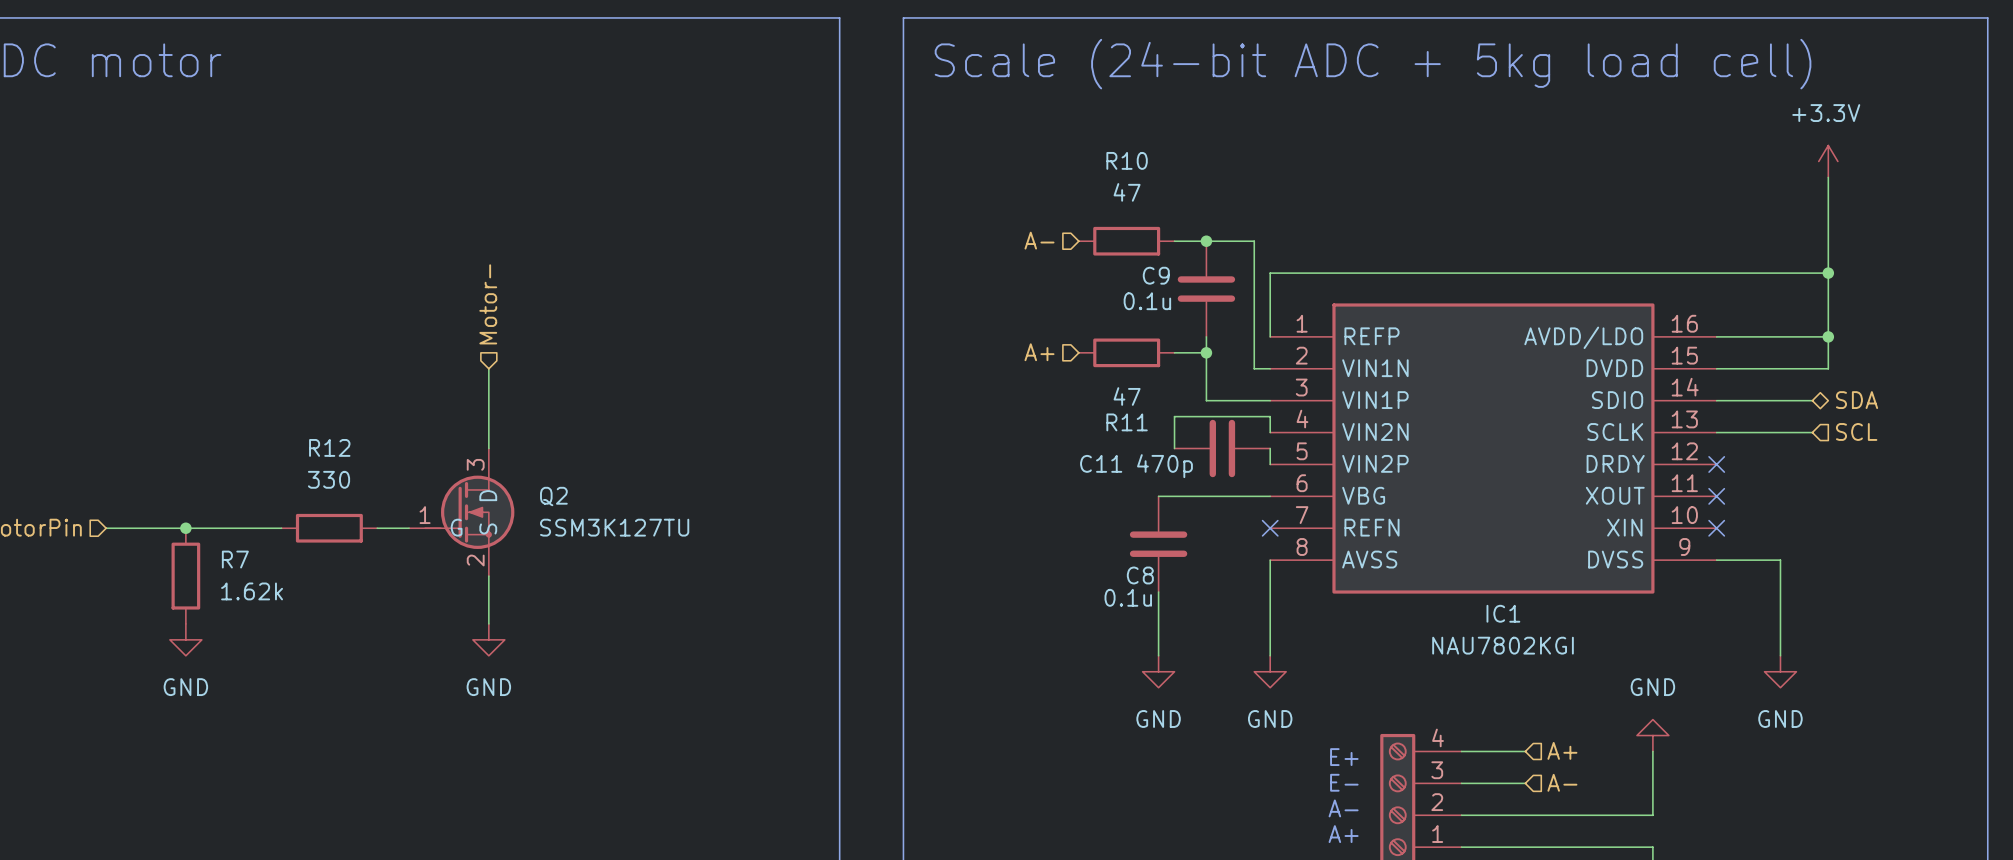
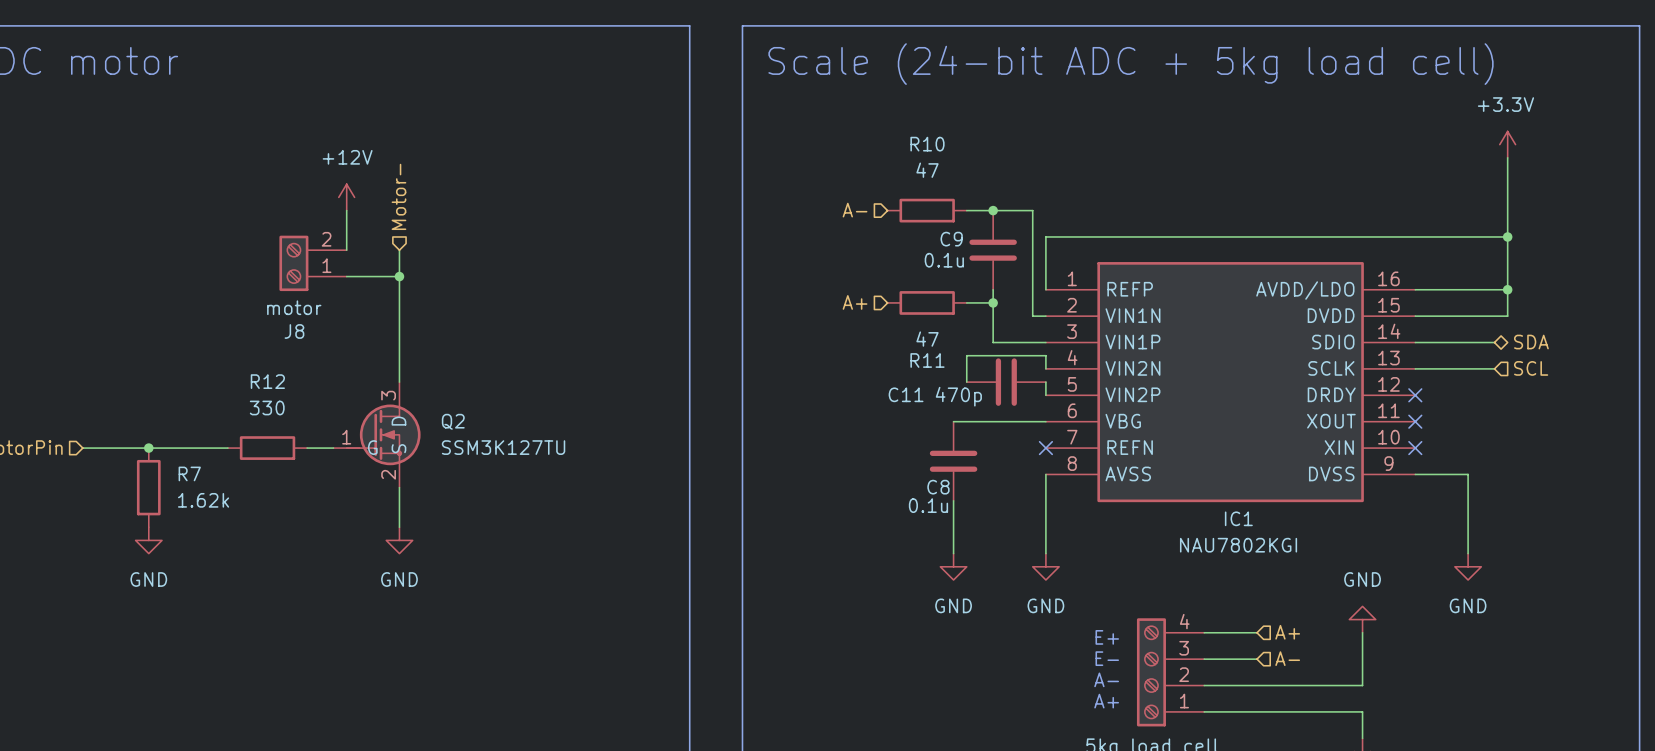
power symbol: none -> +12V (346, 197)
wire: none -> (346, 210) (346, 250)
wire: none -> (399, 250) (399, 316)
hierarchical label position: Motor- (488, 304) -> Motor- (398, 196)
J8: none -> motor (313, 263)
wire: none -> (346, 276) (399, 276)
junction: none -> (399, 276)

